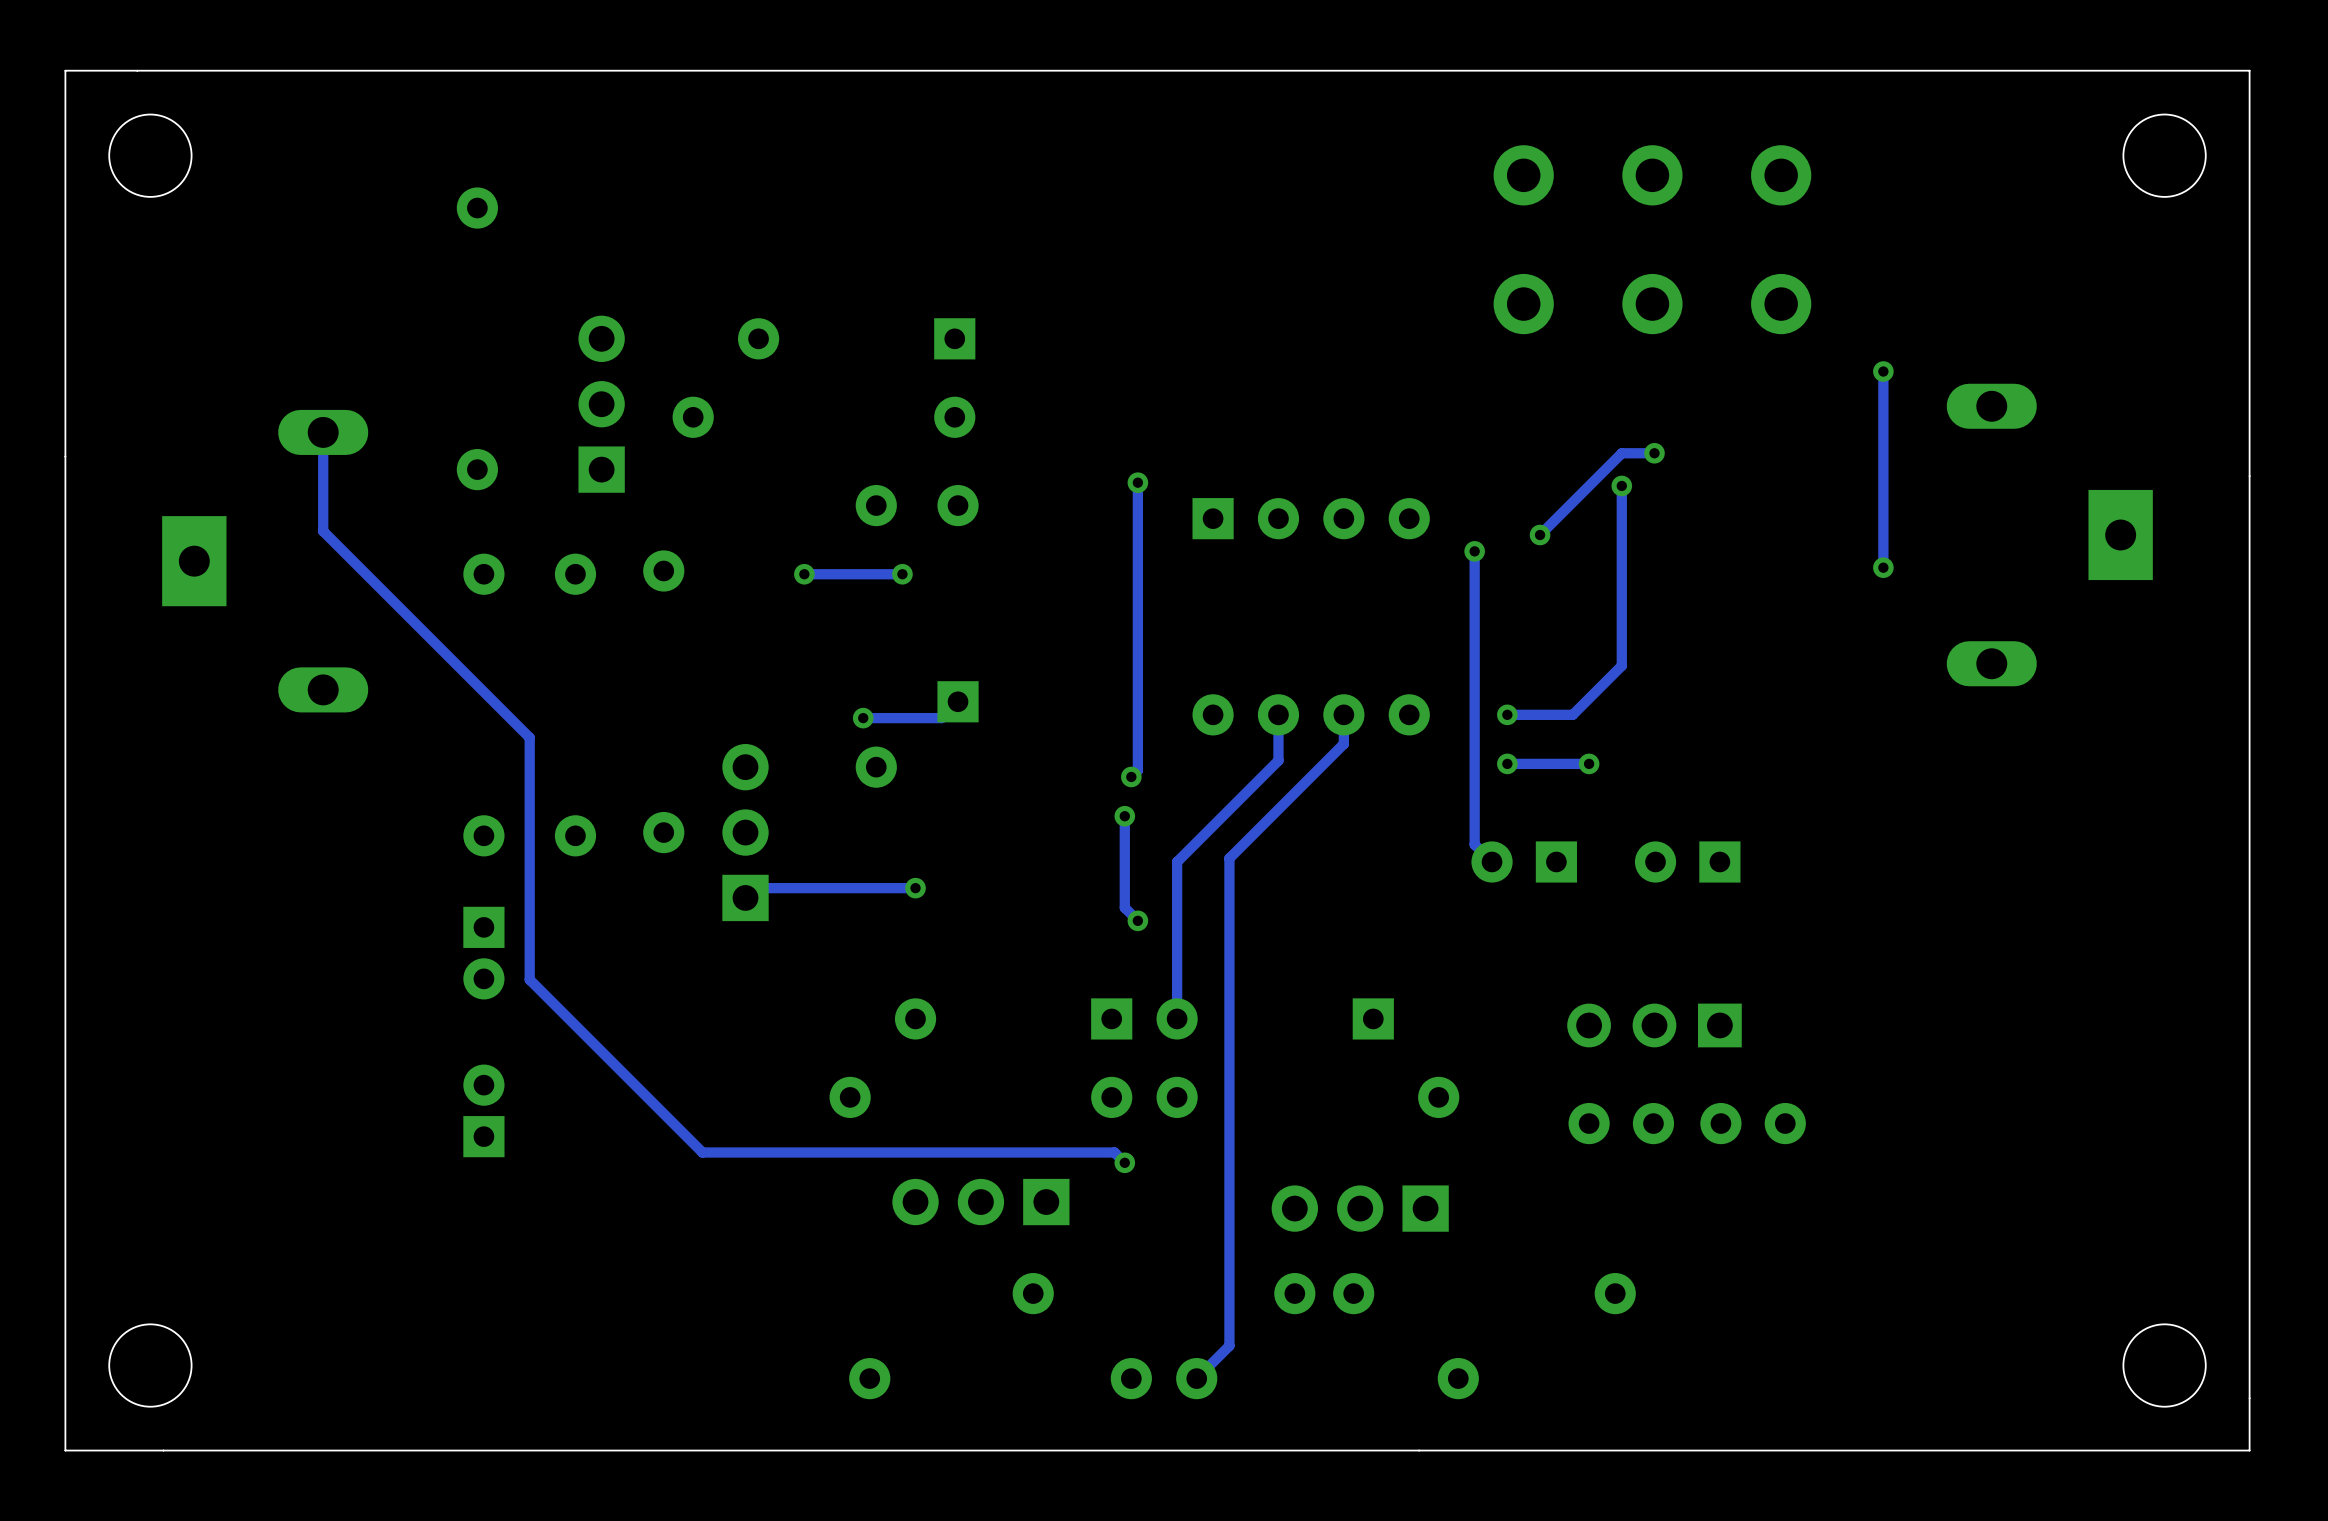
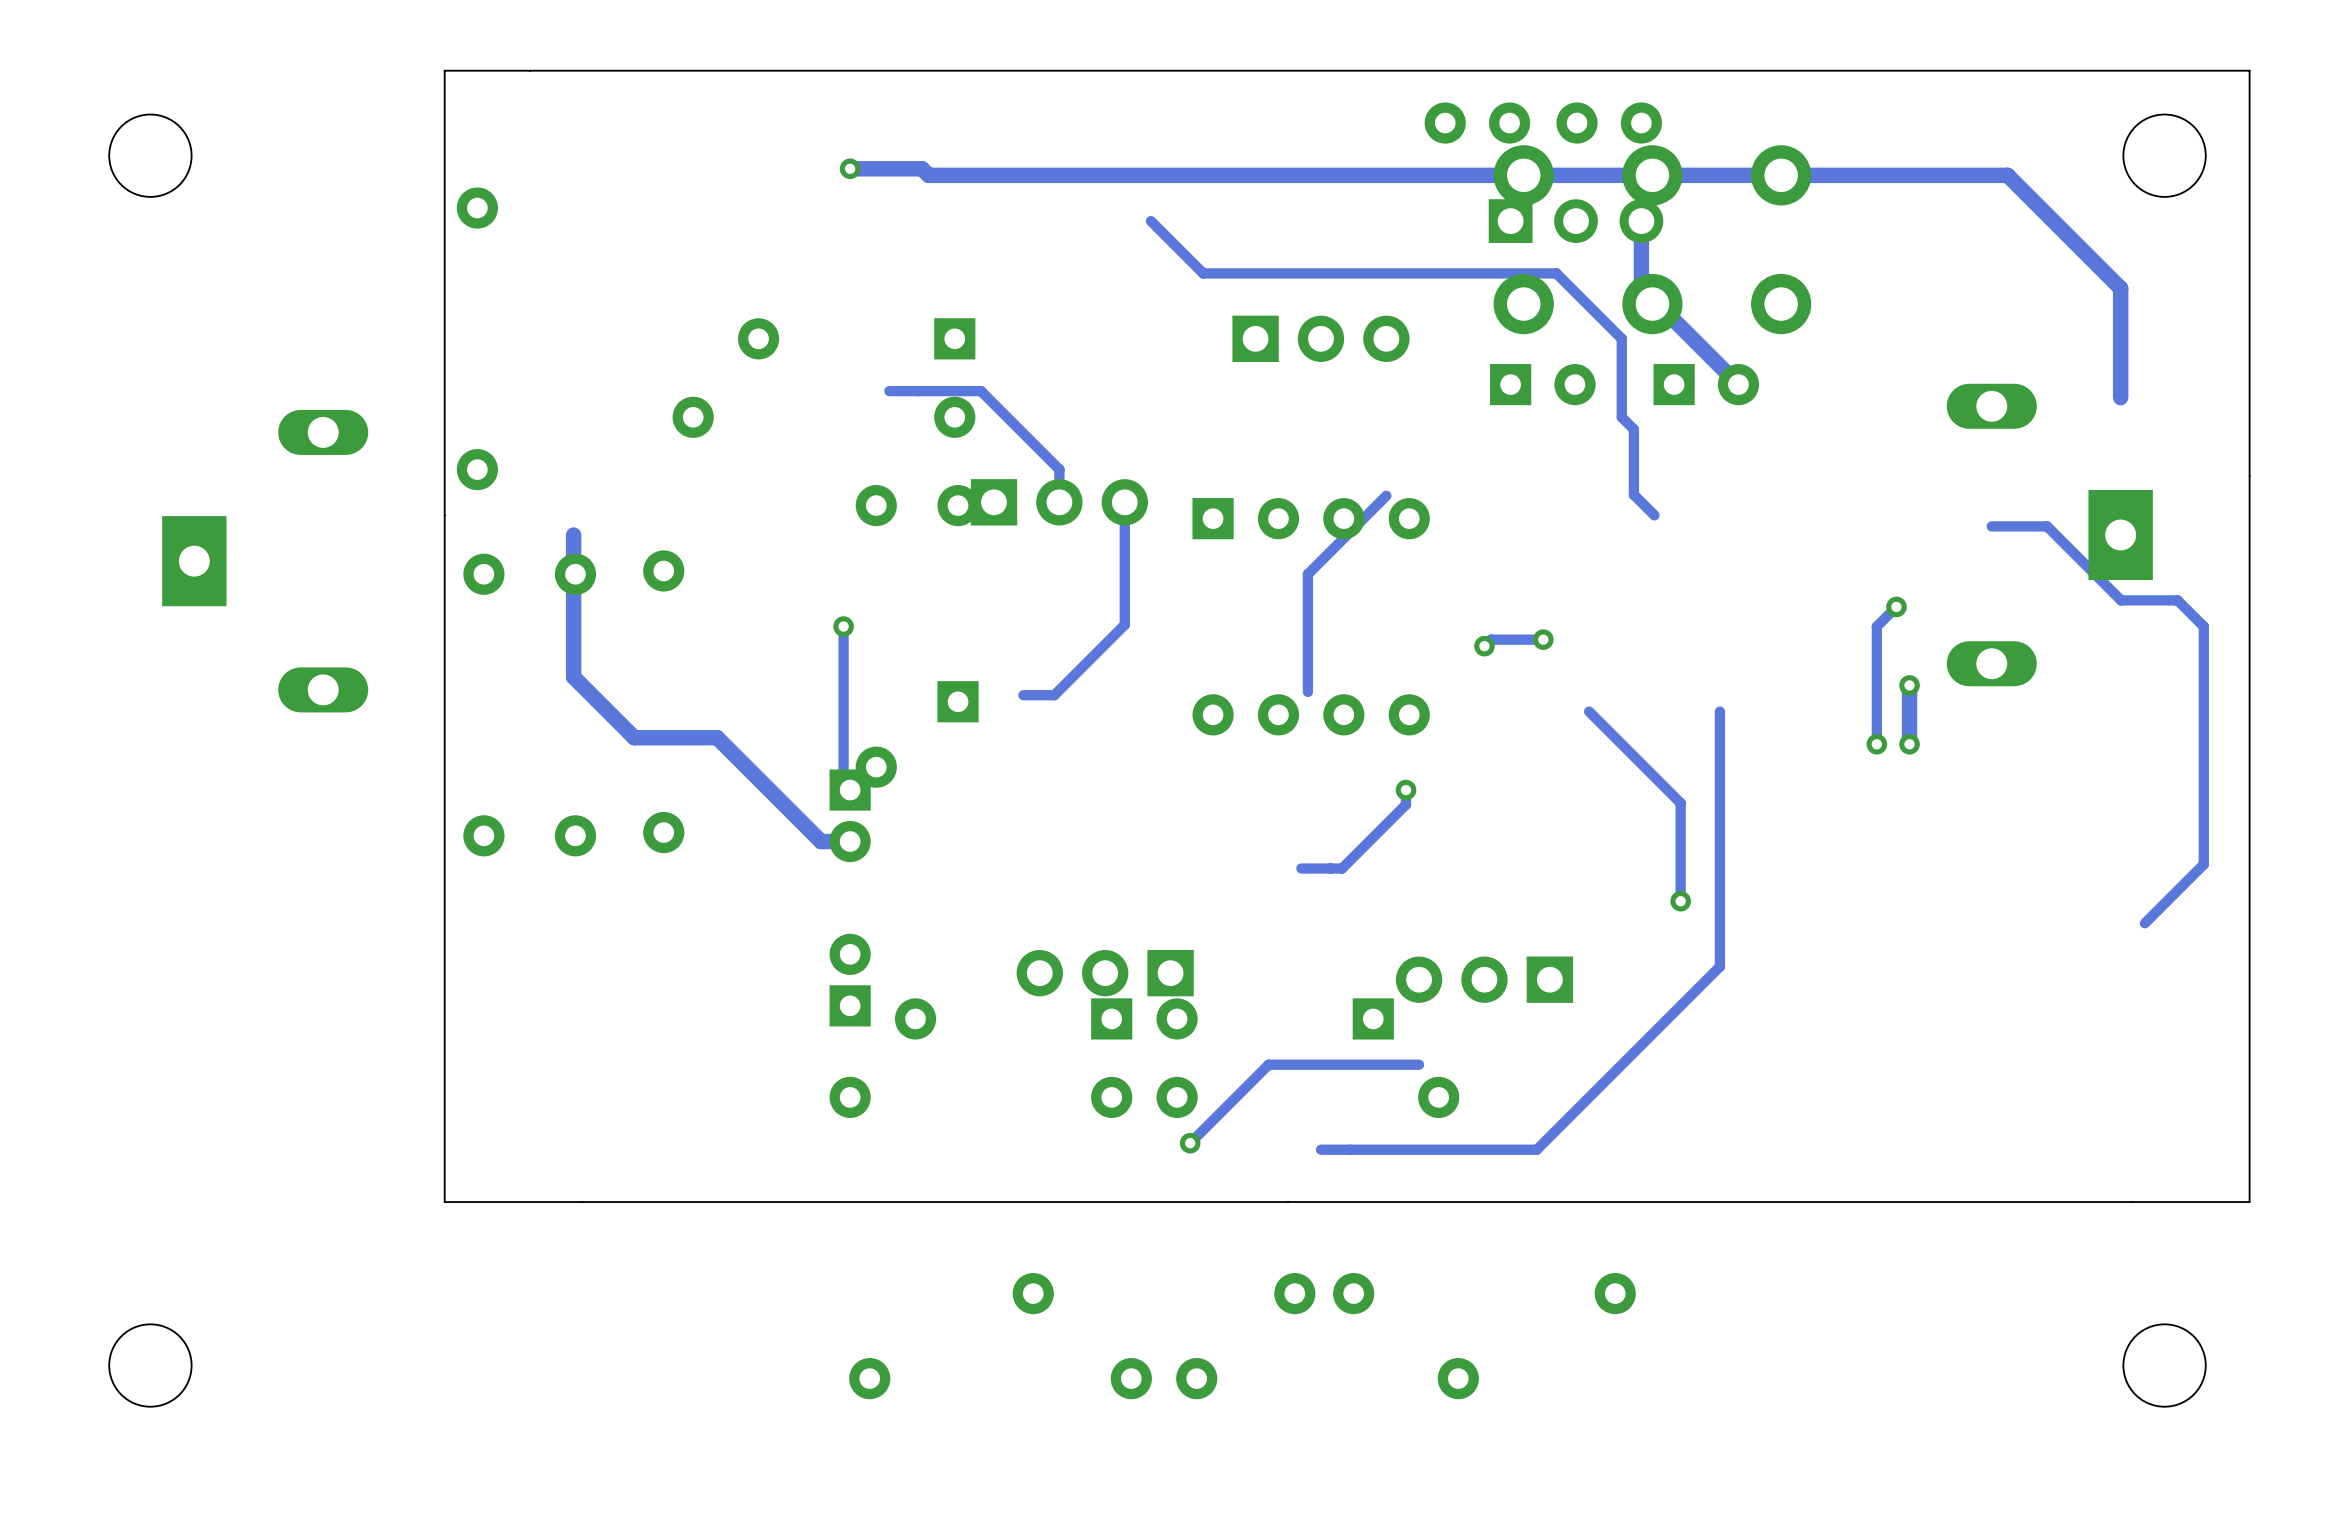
board edge: (444, 70) (65, 70) (65, 1450) (2249, 1450) (2249, 1202) -> (444, 70) (444, 1202) (2249, 1202)
part: none -> (1477, 123)
part: none -> (1609, 123)
track: none -> (850, 168) (922, 168) (928, 175) (2007, 175) (2120, 288) (2120, 397)
via: none -> (850, 168)
track: none -> (1150, 221) (1203, 273) (1556, 273) (1621, 338) (1621, 417) (1633, 429) (1633, 494) (1654, 515)
part: none -> (1576, 221)
track: none -> (1641, 221) (1641, 287) (1738, 384)
part: none -> (1320, 338)
track: (1883, 371) (1883, 567) -> none
via: (1883, 371) -> none
part: none -> (1542, 384)
part: none -> (1706, 384)
track: none -> (889, 391) (981, 391) (1059, 469) (1059, 502)
part: (601, 404) -> none
track: (323, 432) (323, 531) (529, 737) (529, 979) (702, 1152) (1114, 1152) (1124, 1162) -> none
track: (1654, 453) (1621, 453) (1540, 535) -> none
via: (1654, 453) -> none
track: (1137, 482) (1137, 770) (1131, 776) -> none
via: (1137, 482) -> none
track: (1621, 485) (1621, 665) (1572, 714) (1507, 714) -> none
via: (1621, 485) -> none
track: none -> (1386, 495) (1307, 574) (1307, 691)
part: none -> (1059, 502)
track: none -> (1124, 502) (1124, 624) (1054, 695) (1023, 695)
track: none -> (1991, 526) (2047, 526) (2121, 600) (2177, 600) (2203, 626) (2203, 864) (2144, 923)
track: none -> (573, 535) (573, 677) (634, 737) (717, 737) (821, 841) (850, 841)
via: (1540, 535) -> none
track: (1474, 551) (1474, 844) (1492, 861) -> none
via: (1474, 551) -> none
via position: (1883, 567) -> (1896, 606)
via: (804, 574) -> none
track: (902, 574) (804, 574) -> none
via: (902, 574) -> none
track: none -> (1896, 606) (1876, 626) (1876, 744)
track: none -> (843, 626) (843, 783) (850, 790)
via: none -> (843, 626)
track: none -> (1543, 639) (1491, 639) (1484, 646)
via: none -> (1543, 639)
via: none -> (1484, 646)
track: none -> (1909, 685) (1909, 744)
via: none -> (1909, 685)
track: (958, 701) (941, 718) (863, 718) -> none
track: none -> (1589, 711) (1680, 803) (1680, 901)
track: none -> (1719, 711) (1719, 966) (1536, 1149) (1320, 1149)
track: (1278, 714) (1278, 760) (1177, 861) (1177, 1018) -> none
track: (1343, 714) (1343, 743) (1229, 858) (1229, 1345) (1196, 1378) -> none
via: (1507, 714) -> none
via: (863, 718) -> none
via: none -> (1876, 744)
via: none -> (1909, 744)
via: (1507, 763) -> none
track: (1589, 763) (1507, 763) -> none
via: (1589, 763) -> none
via: (1131, 776) -> none
track: none -> (1405, 790) (1405, 804) (1342, 868) (1301, 868)
via: none -> (1405, 790)
part: none -> (850, 815)
track: (1124, 816) (1124, 907) (1137, 920) -> none
via: (1124, 816) -> none
part: (745, 832) -> none
part: (1524, 861) -> none
part: (1687, 861) -> none
track: (915, 888) (755, 888) (745, 897) -> none
via: (915, 888) -> none
via: none -> (1680, 901)
via: (1137, 920) -> none
part: (483, 953) -> none
part: none -> (1105, 973)
part: none -> (1484, 979)
part: none -> (850, 980)
part: (1654, 1025) -> none
track: none -> (1419, 1064) (1268, 1064) (1190, 1143)
part: (483, 1110) -> none
part: (1621, 1123) -> none
part: (1753, 1123) -> none
via position: (1124, 1162) -> (1190, 1143)
part: (980, 1202) -> none
part: (1360, 1208) -> none

